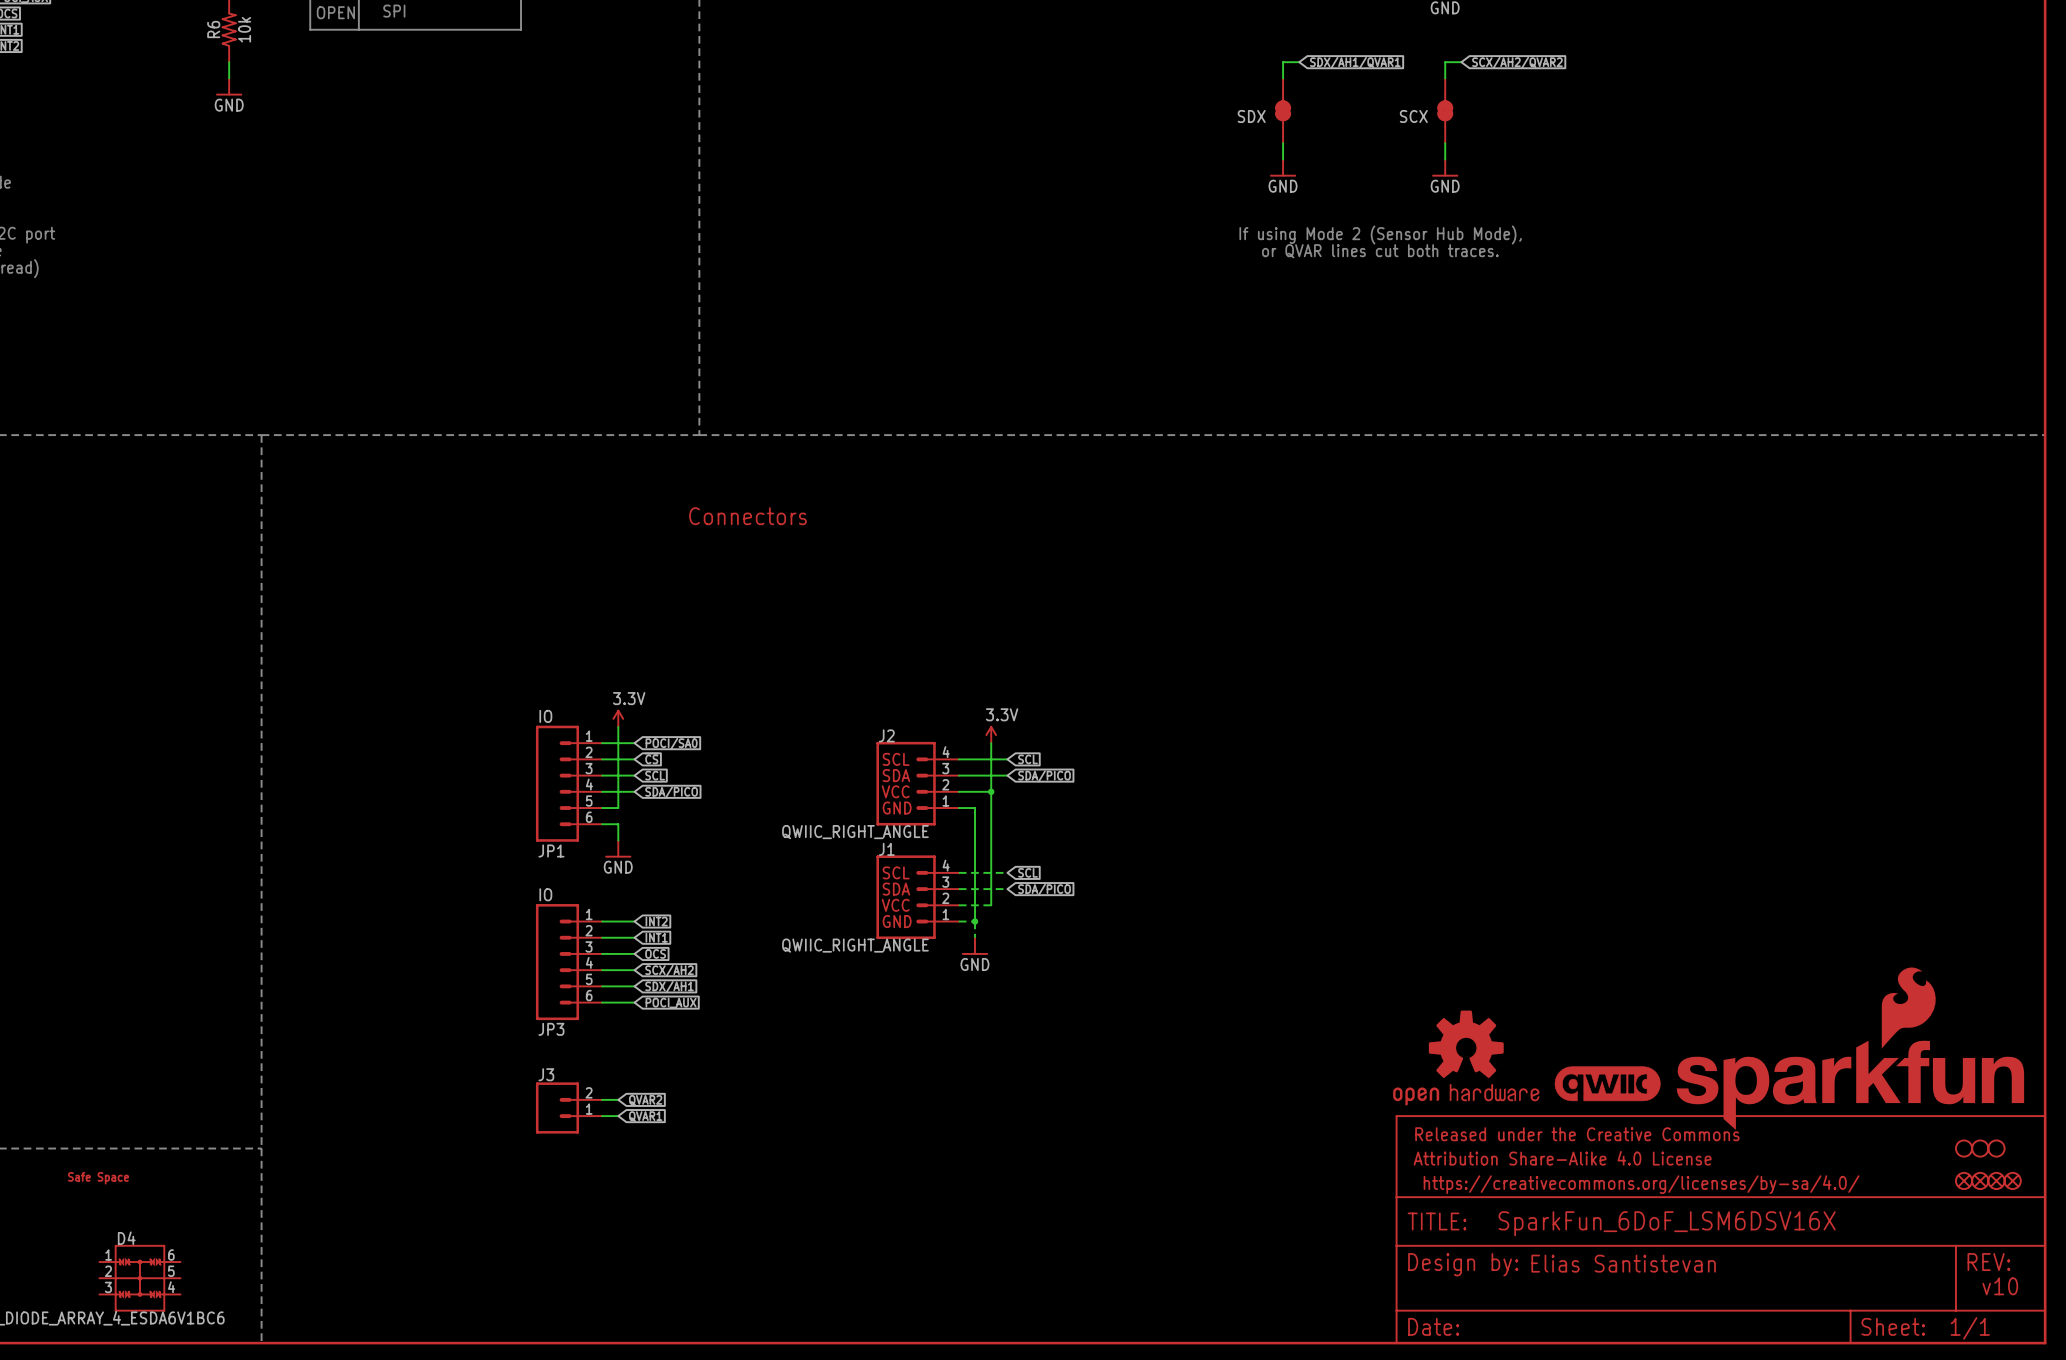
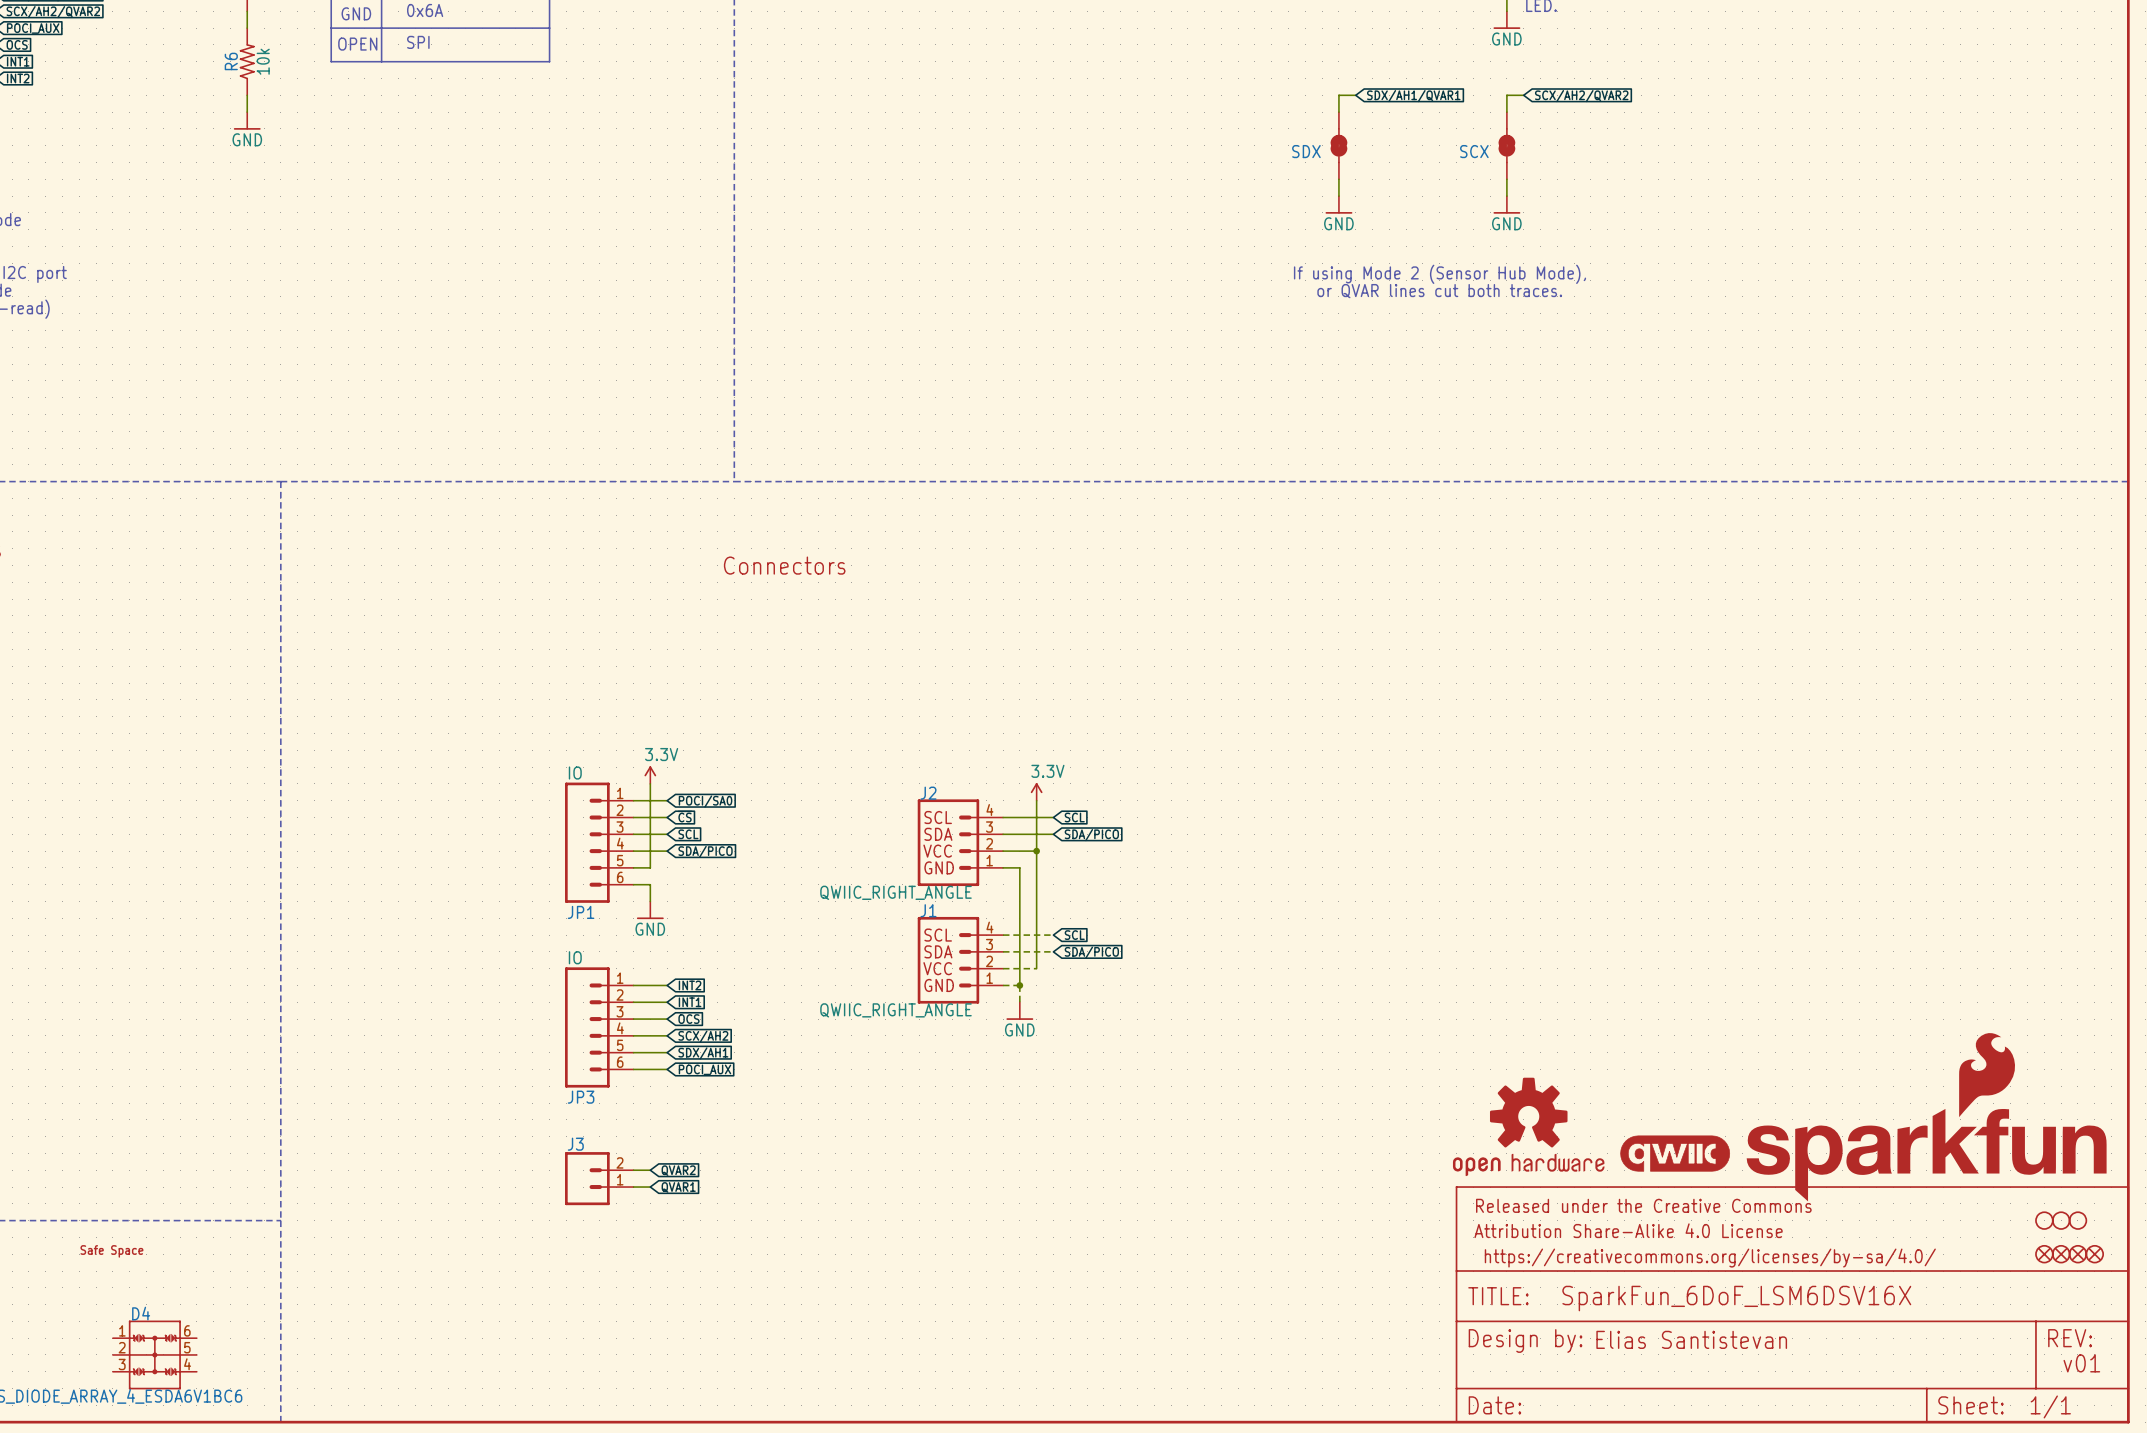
text: v10 (2000, 1286) -> v01 (2081, 1363)

